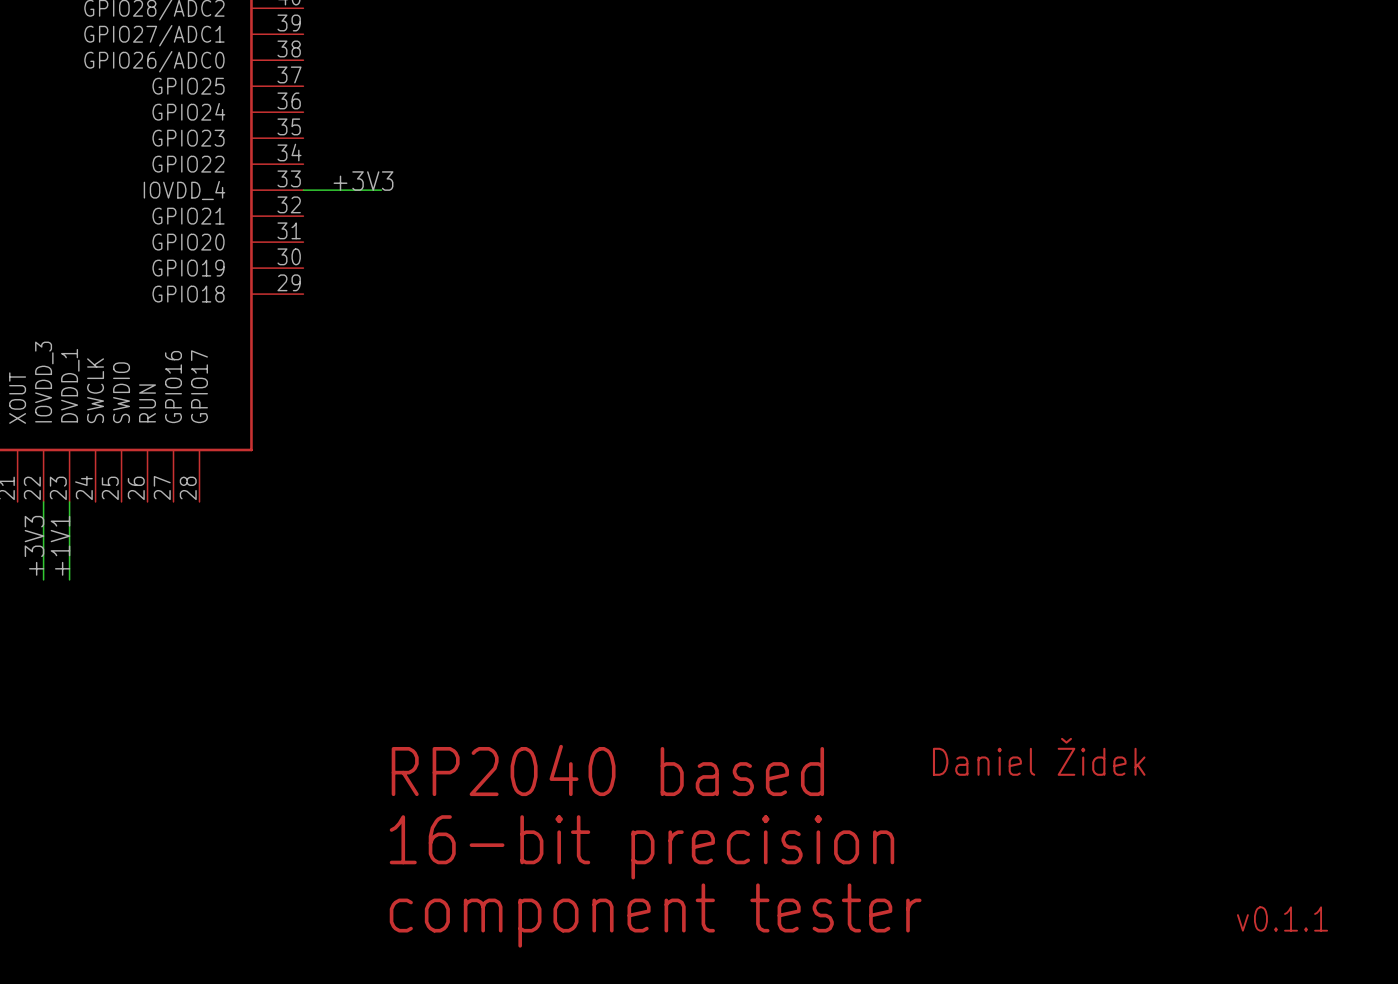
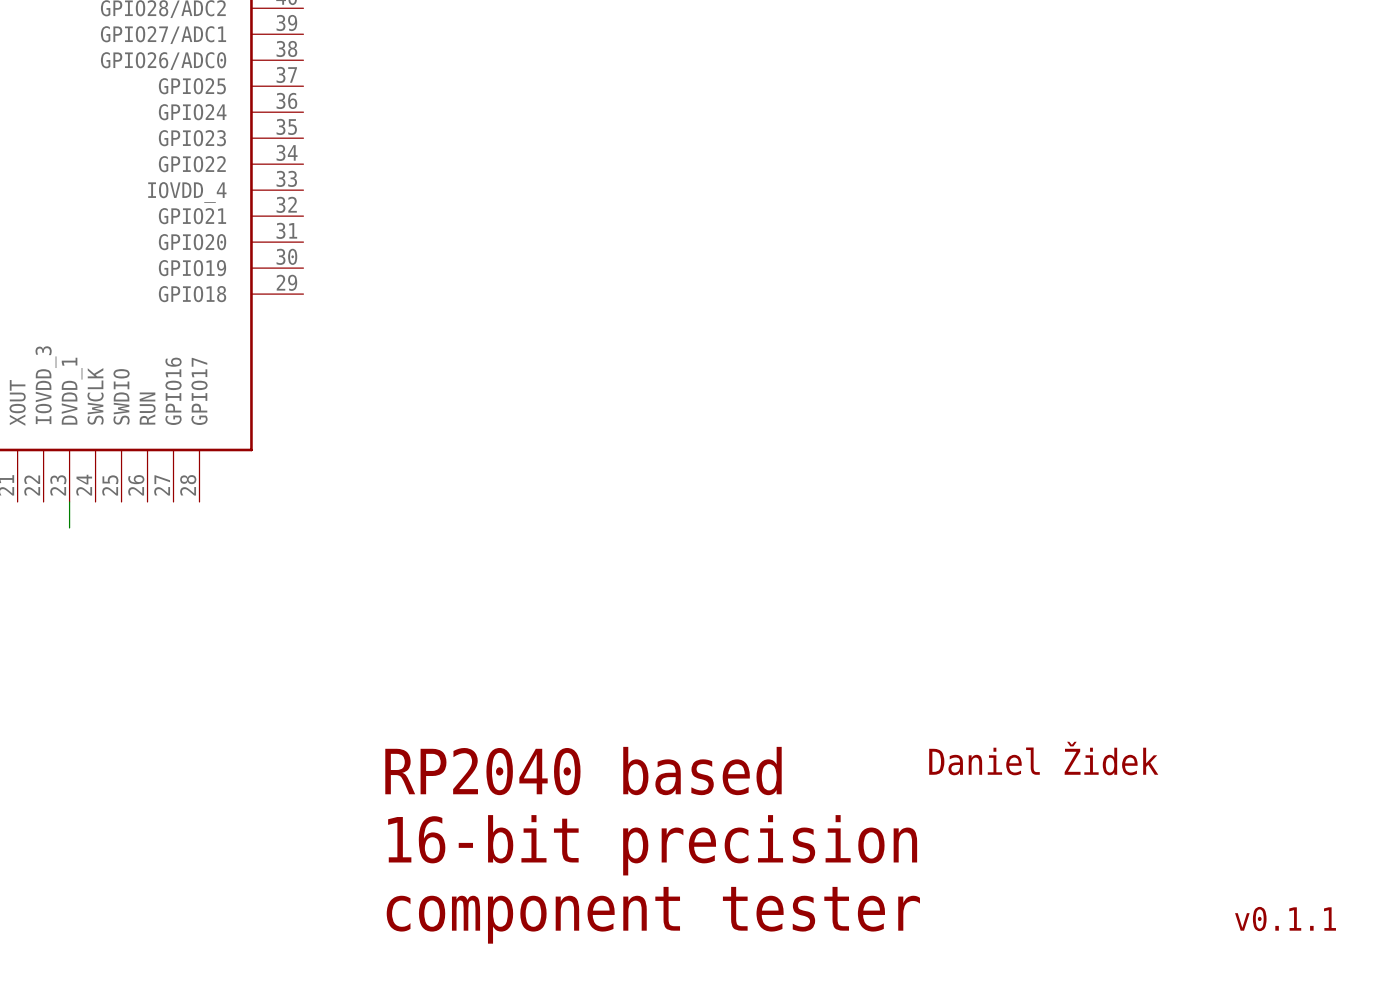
label: +3V3 (363, 181) -> none
wire: (303, 190) (381, 190) -> none
wire: (43, 501) (43, 579) -> none
wire: (69, 527) (69, 579) -> none
label: +3V3 (34, 545) -> none
label: +1V1 (60, 545) -> none

